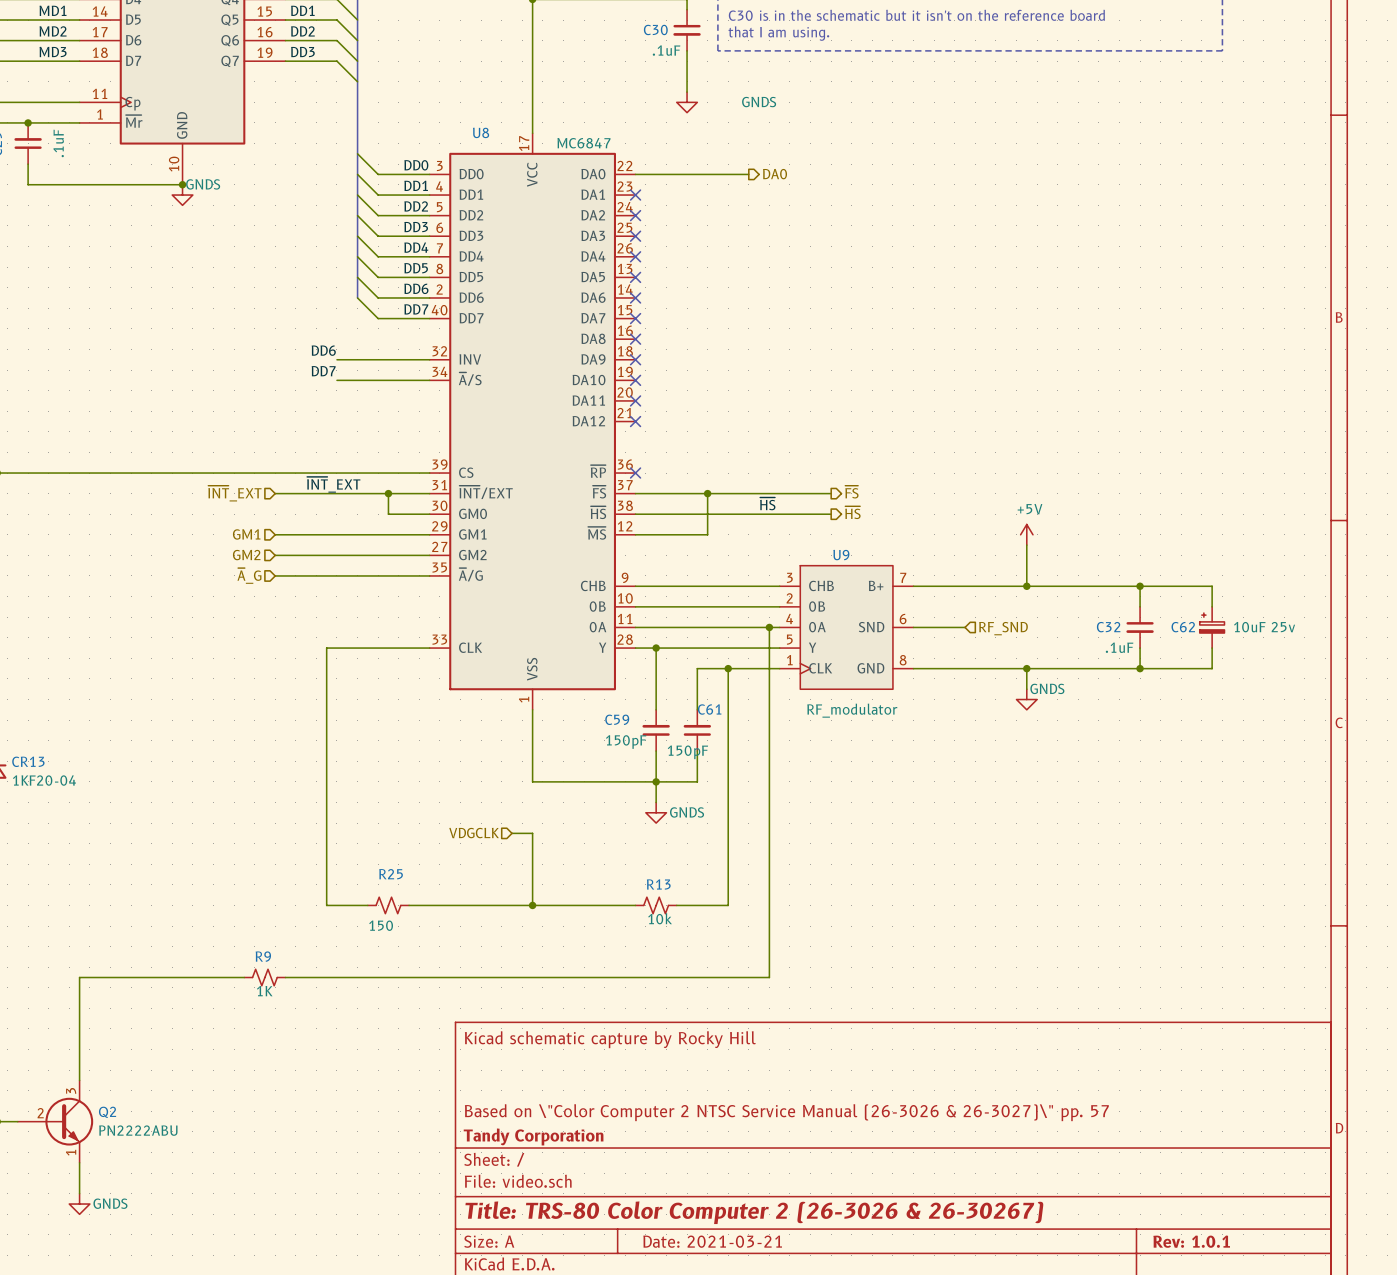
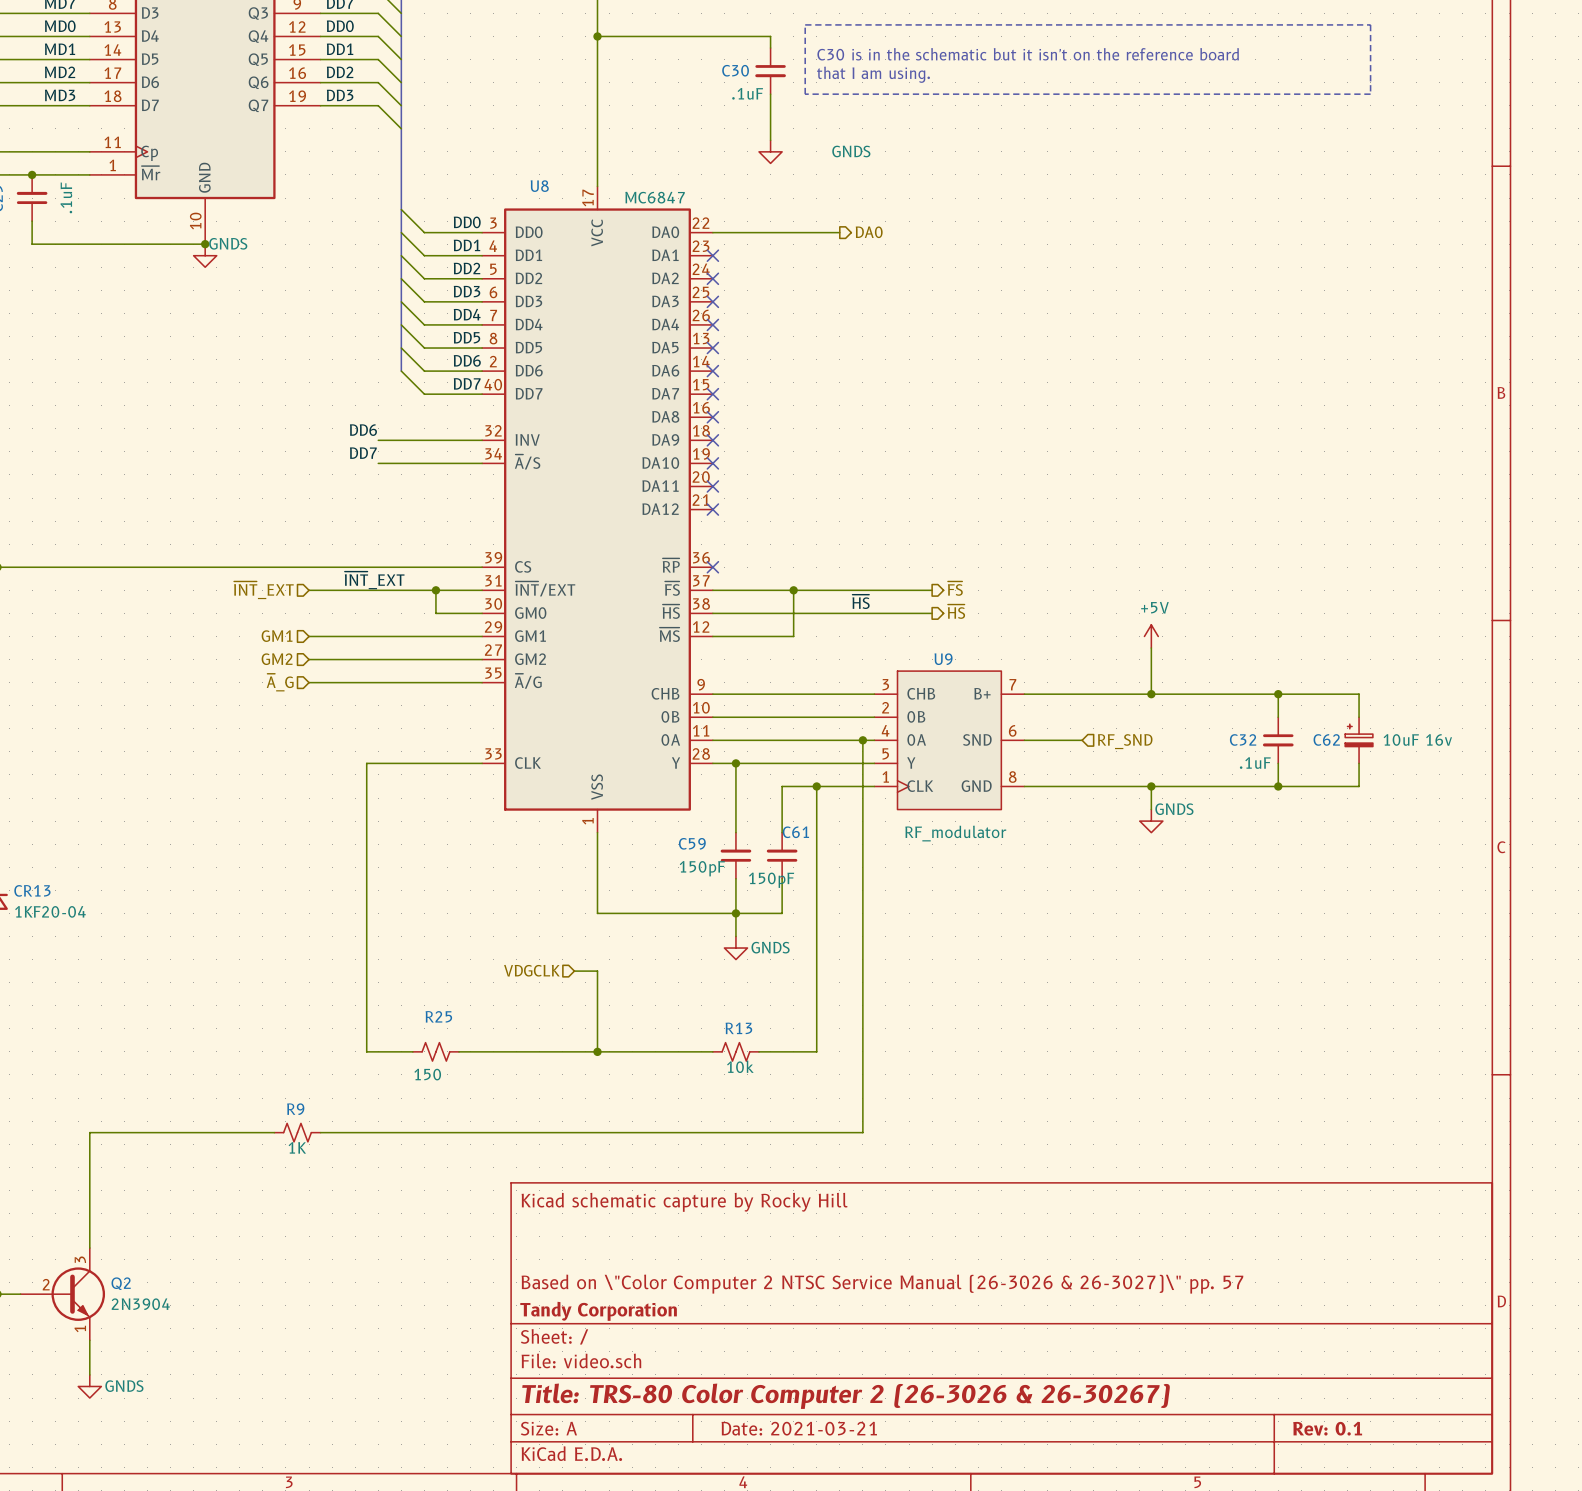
C62 value: 10uF 25v (1264, 627) -> 10uF 16v (1417, 739)
Q2 value: PN2222ABU (138, 1130) -> 2N3904 (140, 1304)
title block: Rev: 1.0.1 (1191, 1241) -> Rev: 0.1 (1327, 1428)

